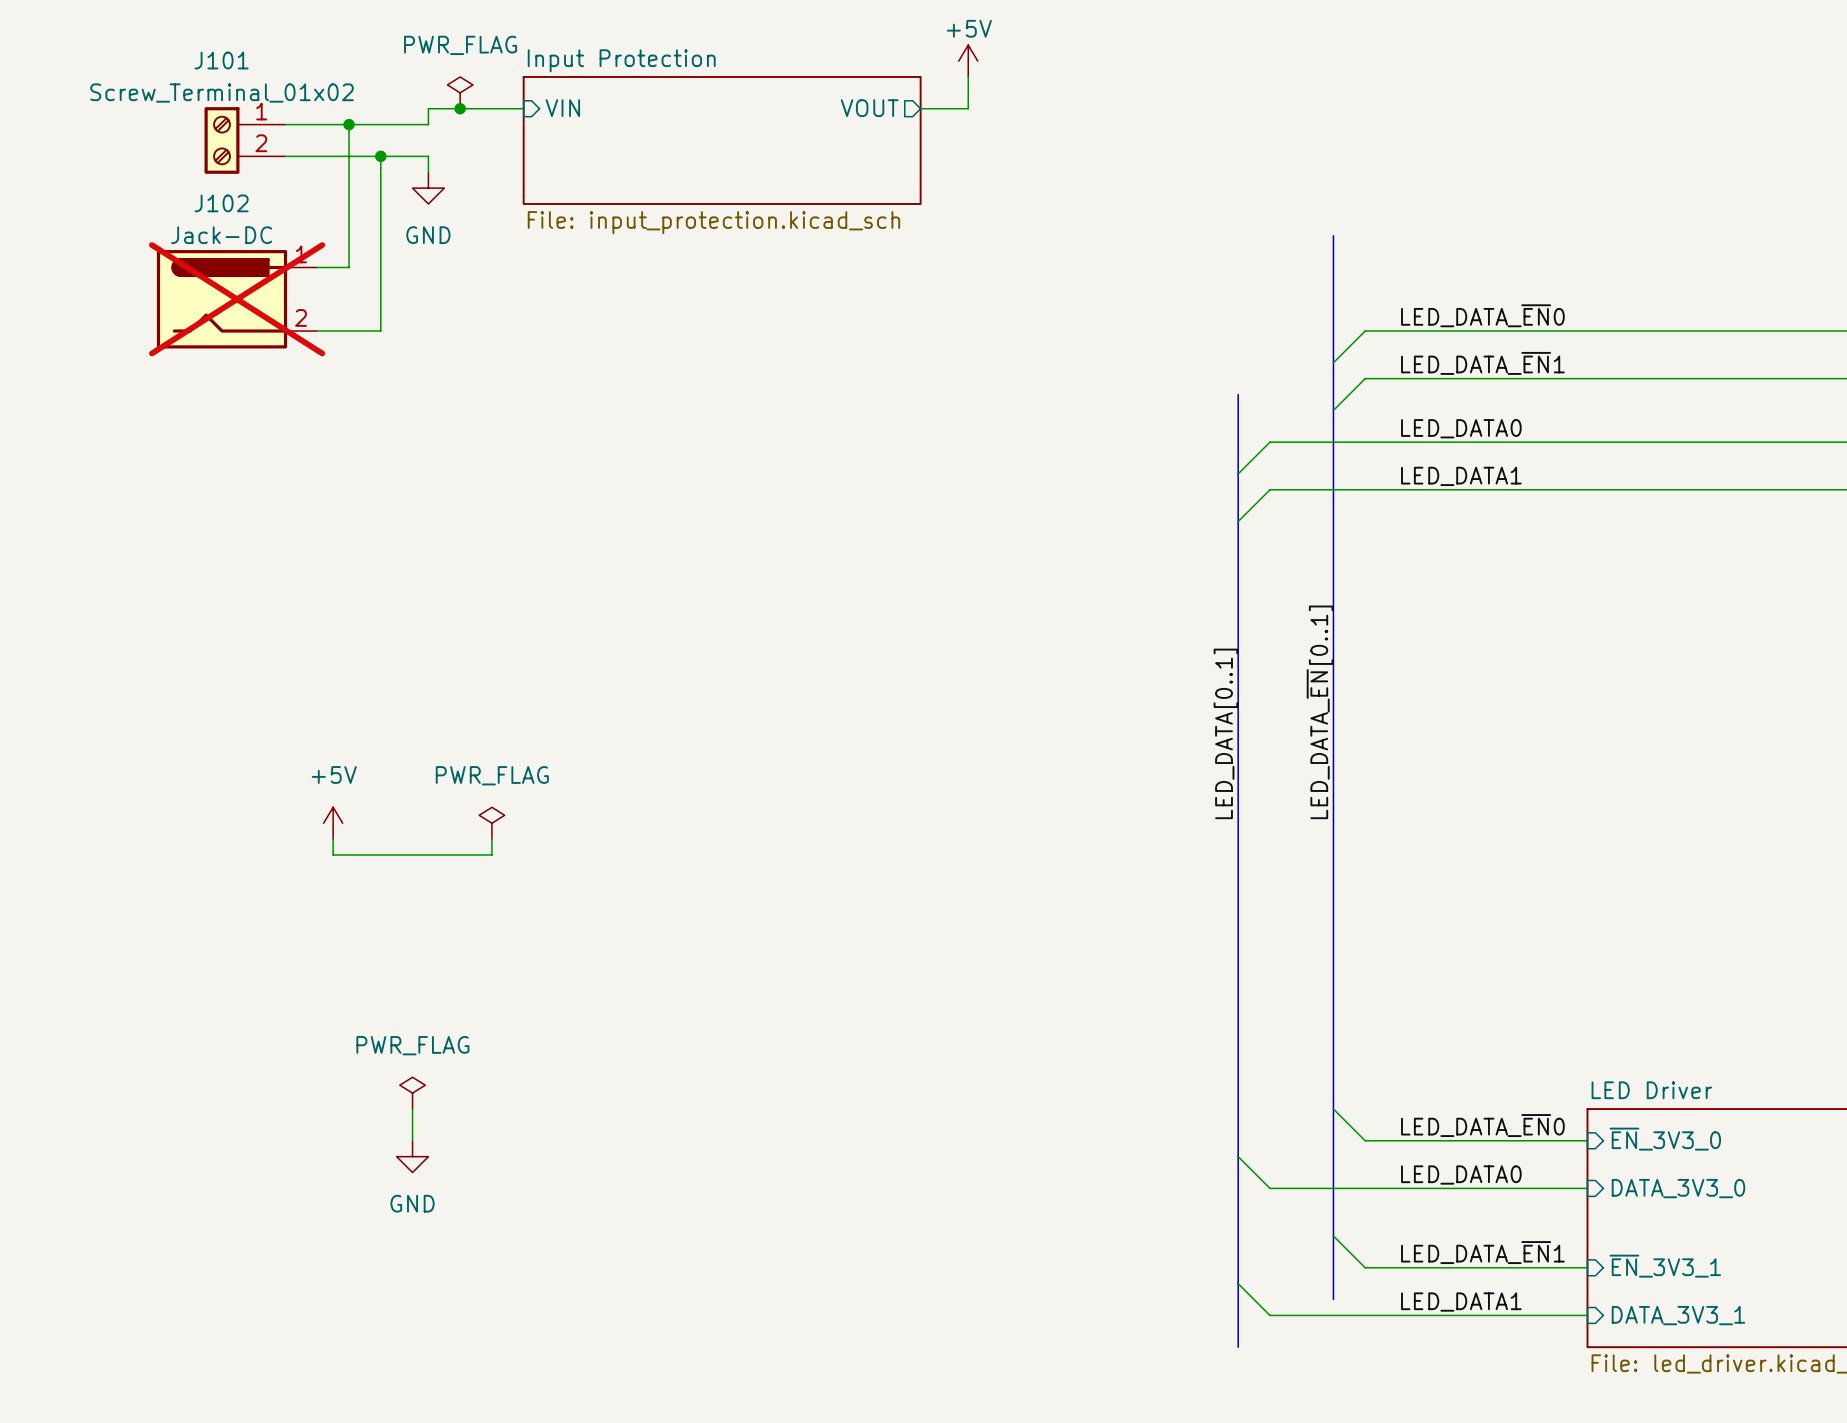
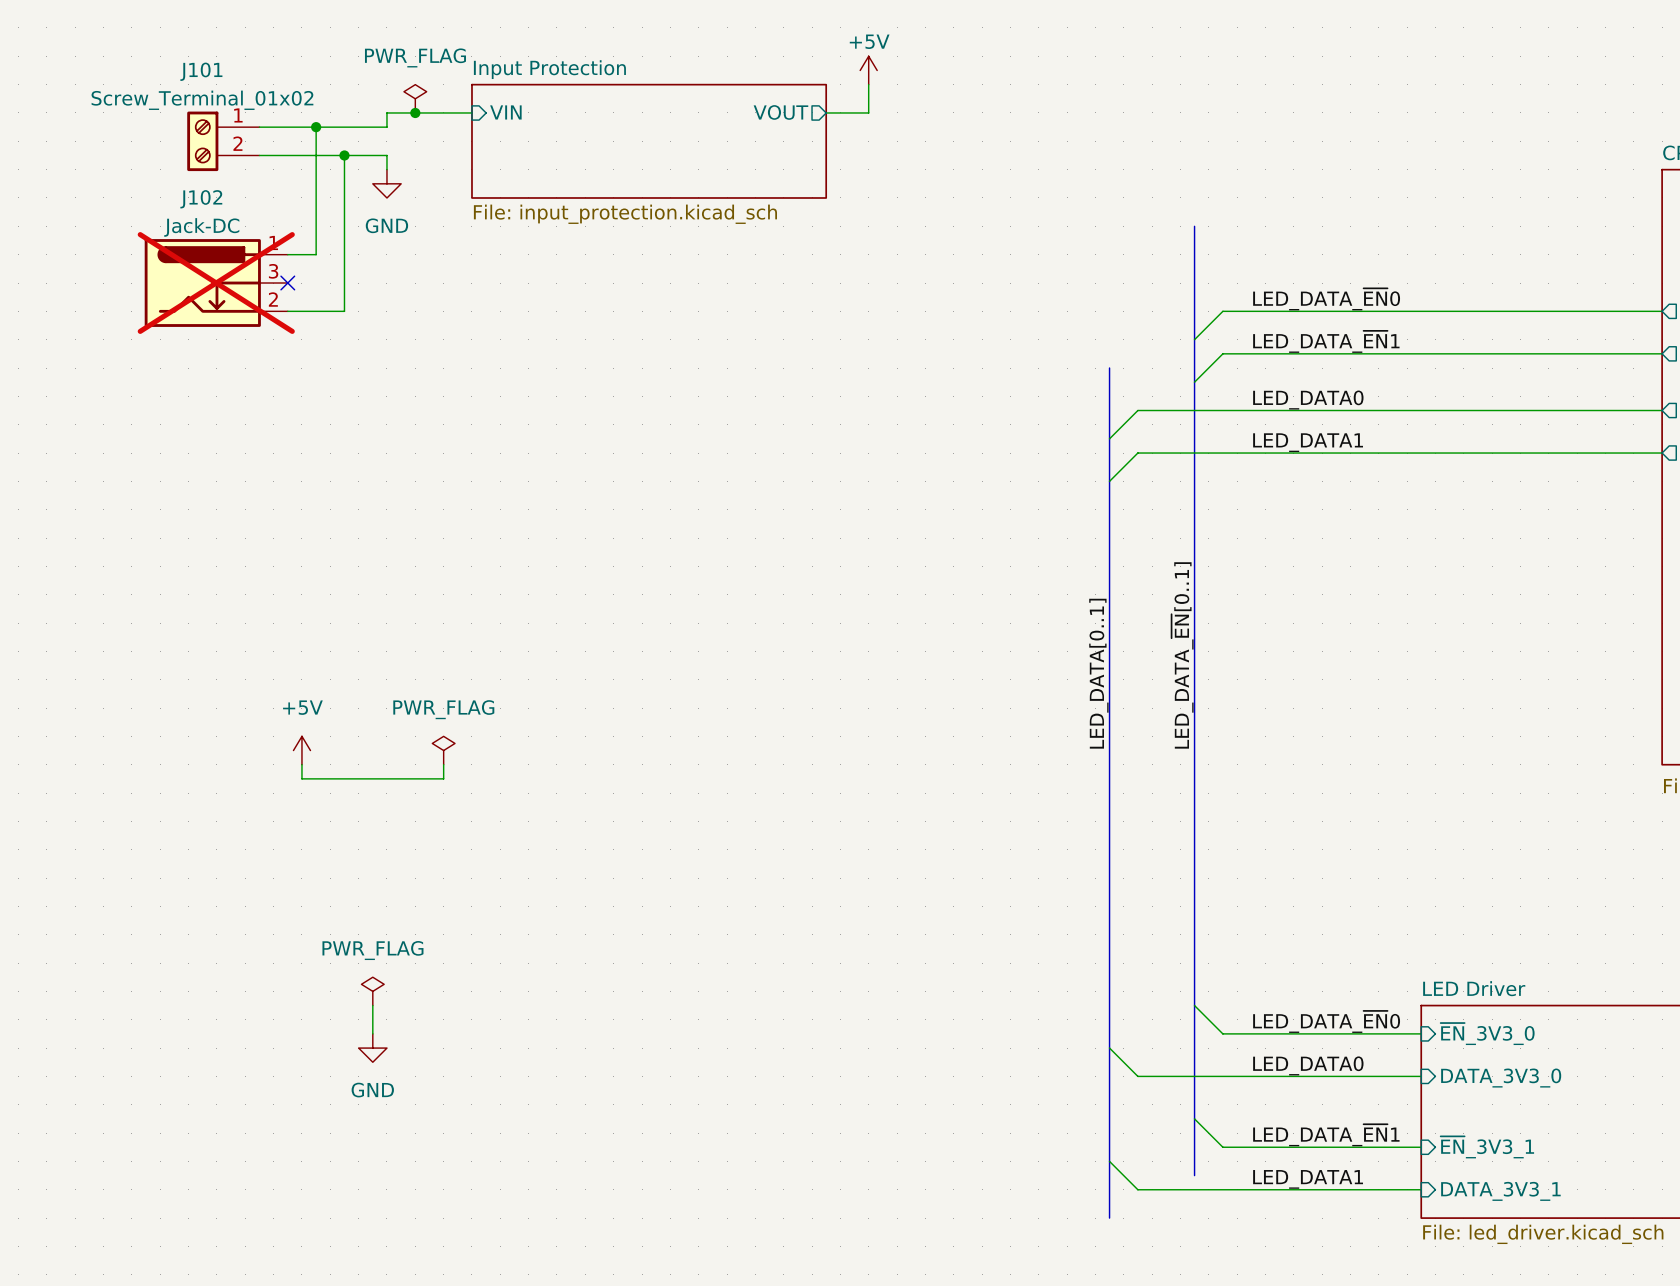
J102 symbol: [156, 250, 318, 349] -> [144, 239, 288, 327]
no-connect mark: none -> (287, 283)

